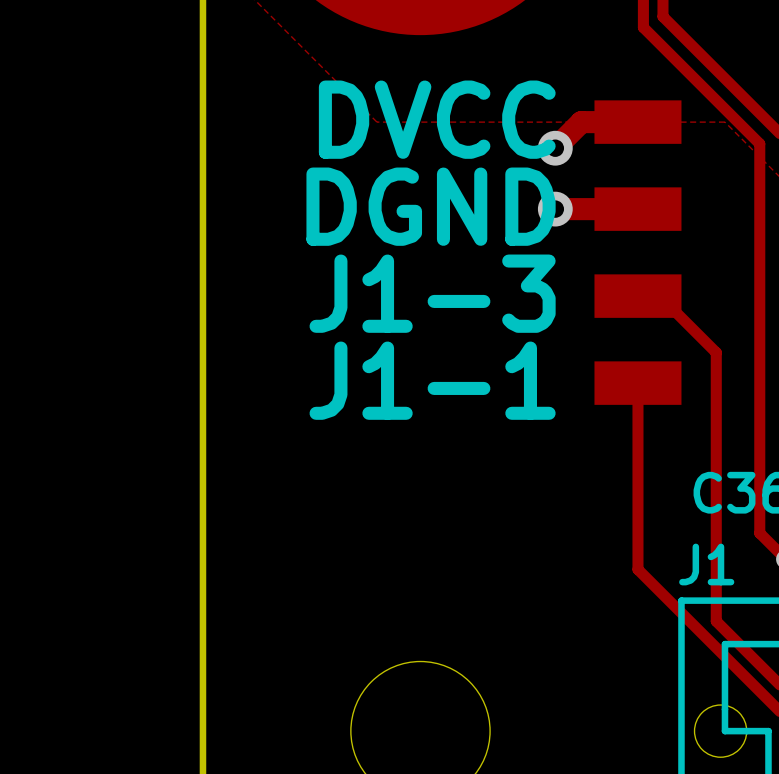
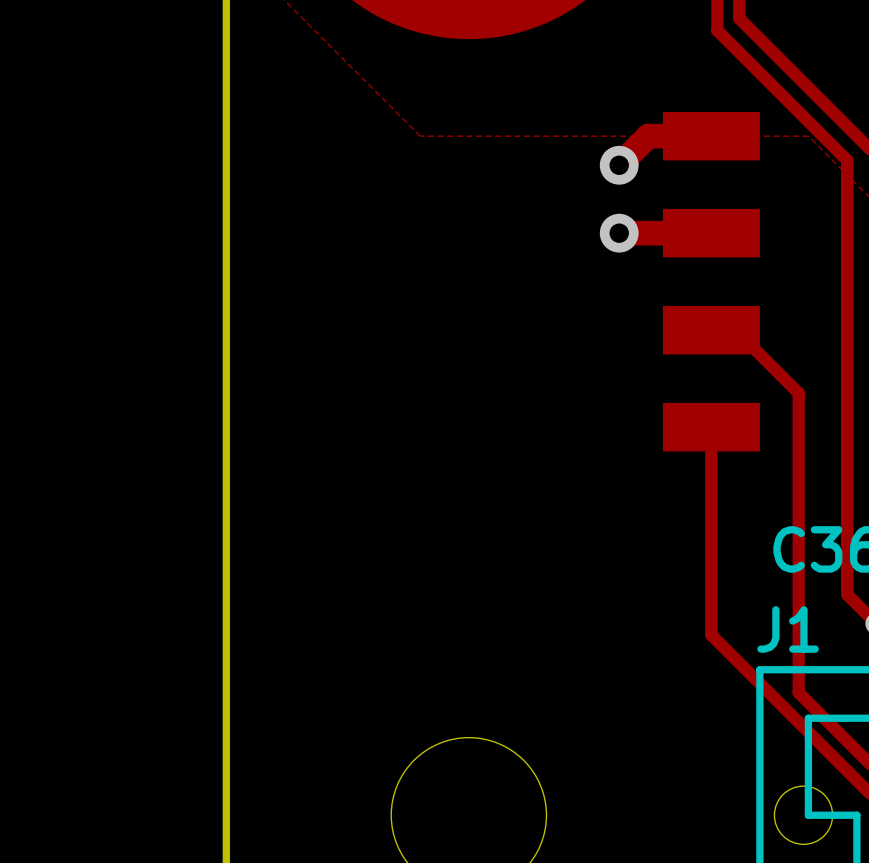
text: DVCC (437, 119) -> none
text: DGND (431, 206) -> none
text: J1-3 (432, 293) -> none
text: J1-1 (432, 380) -> none

